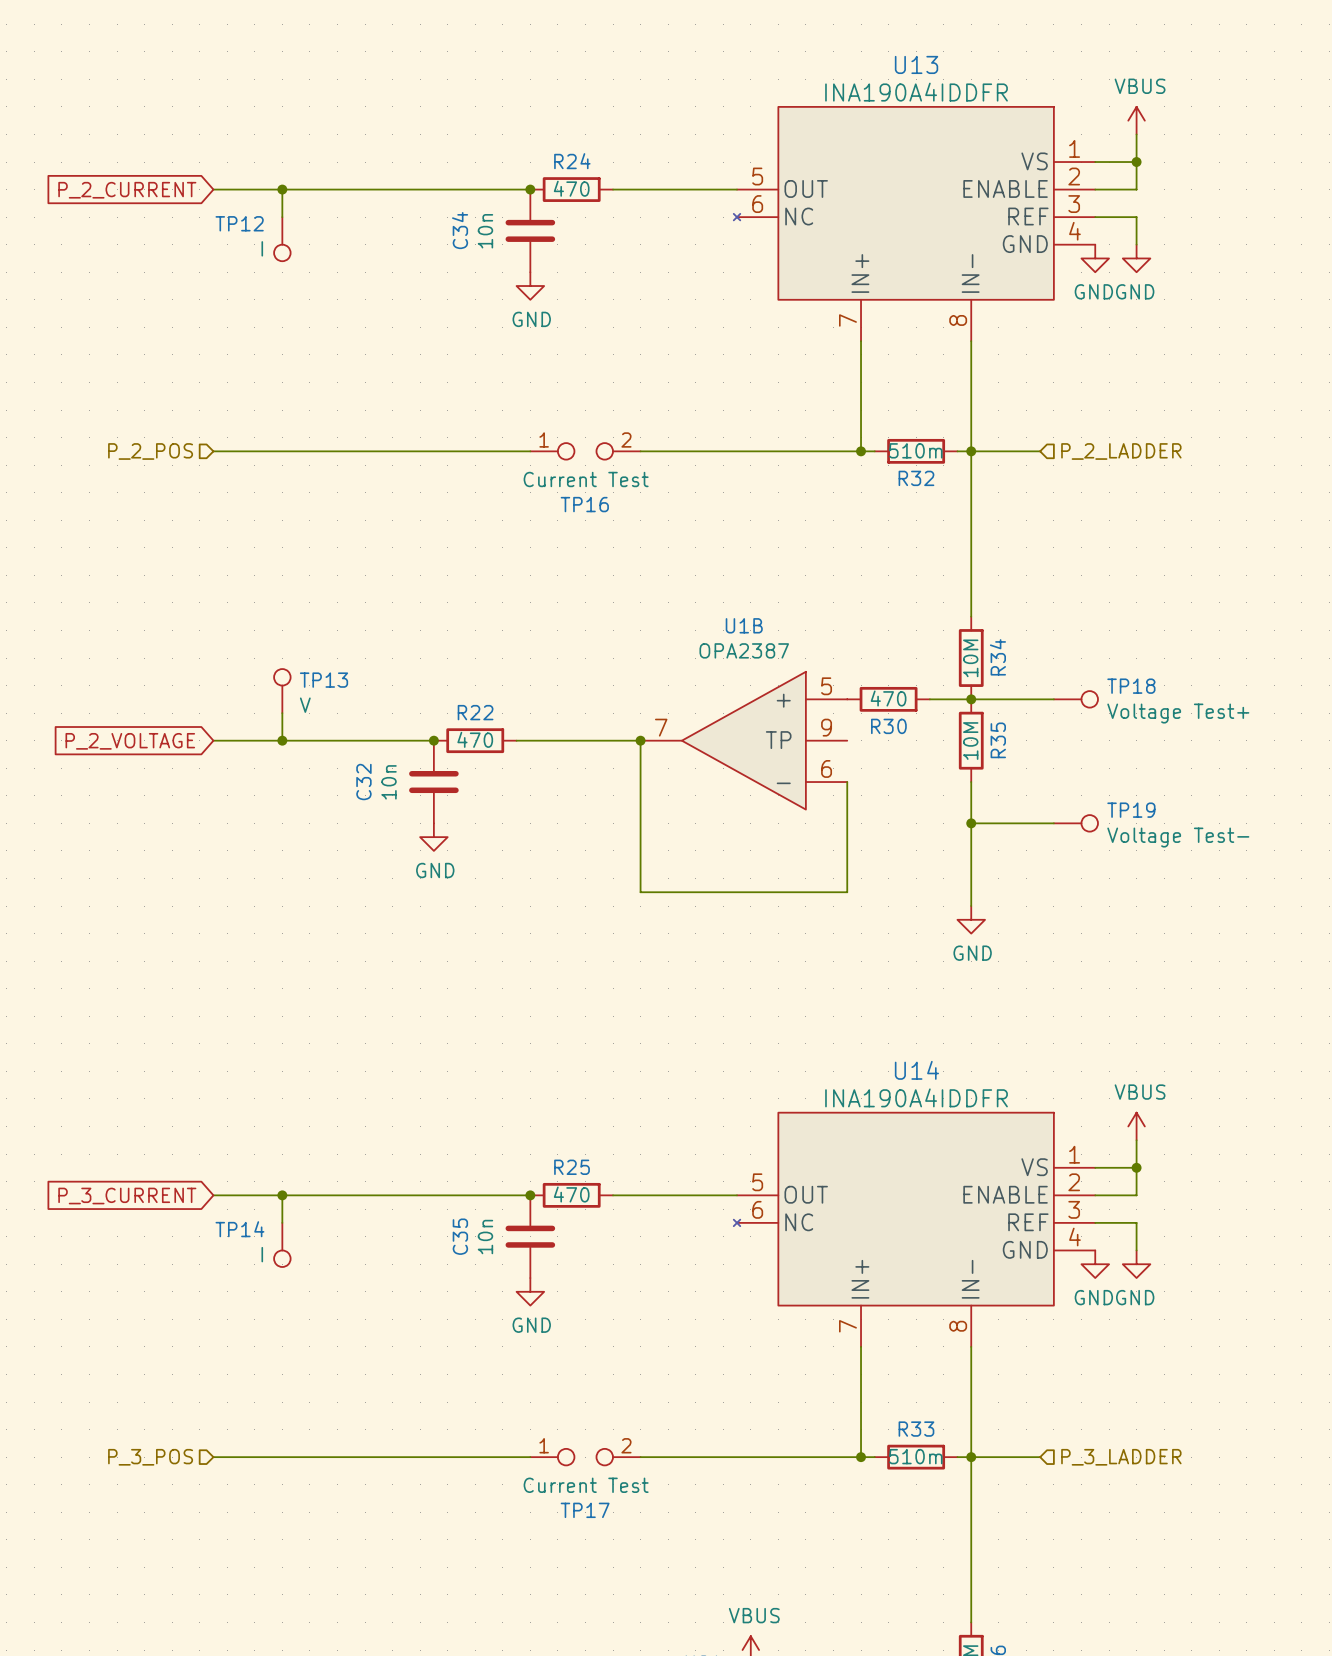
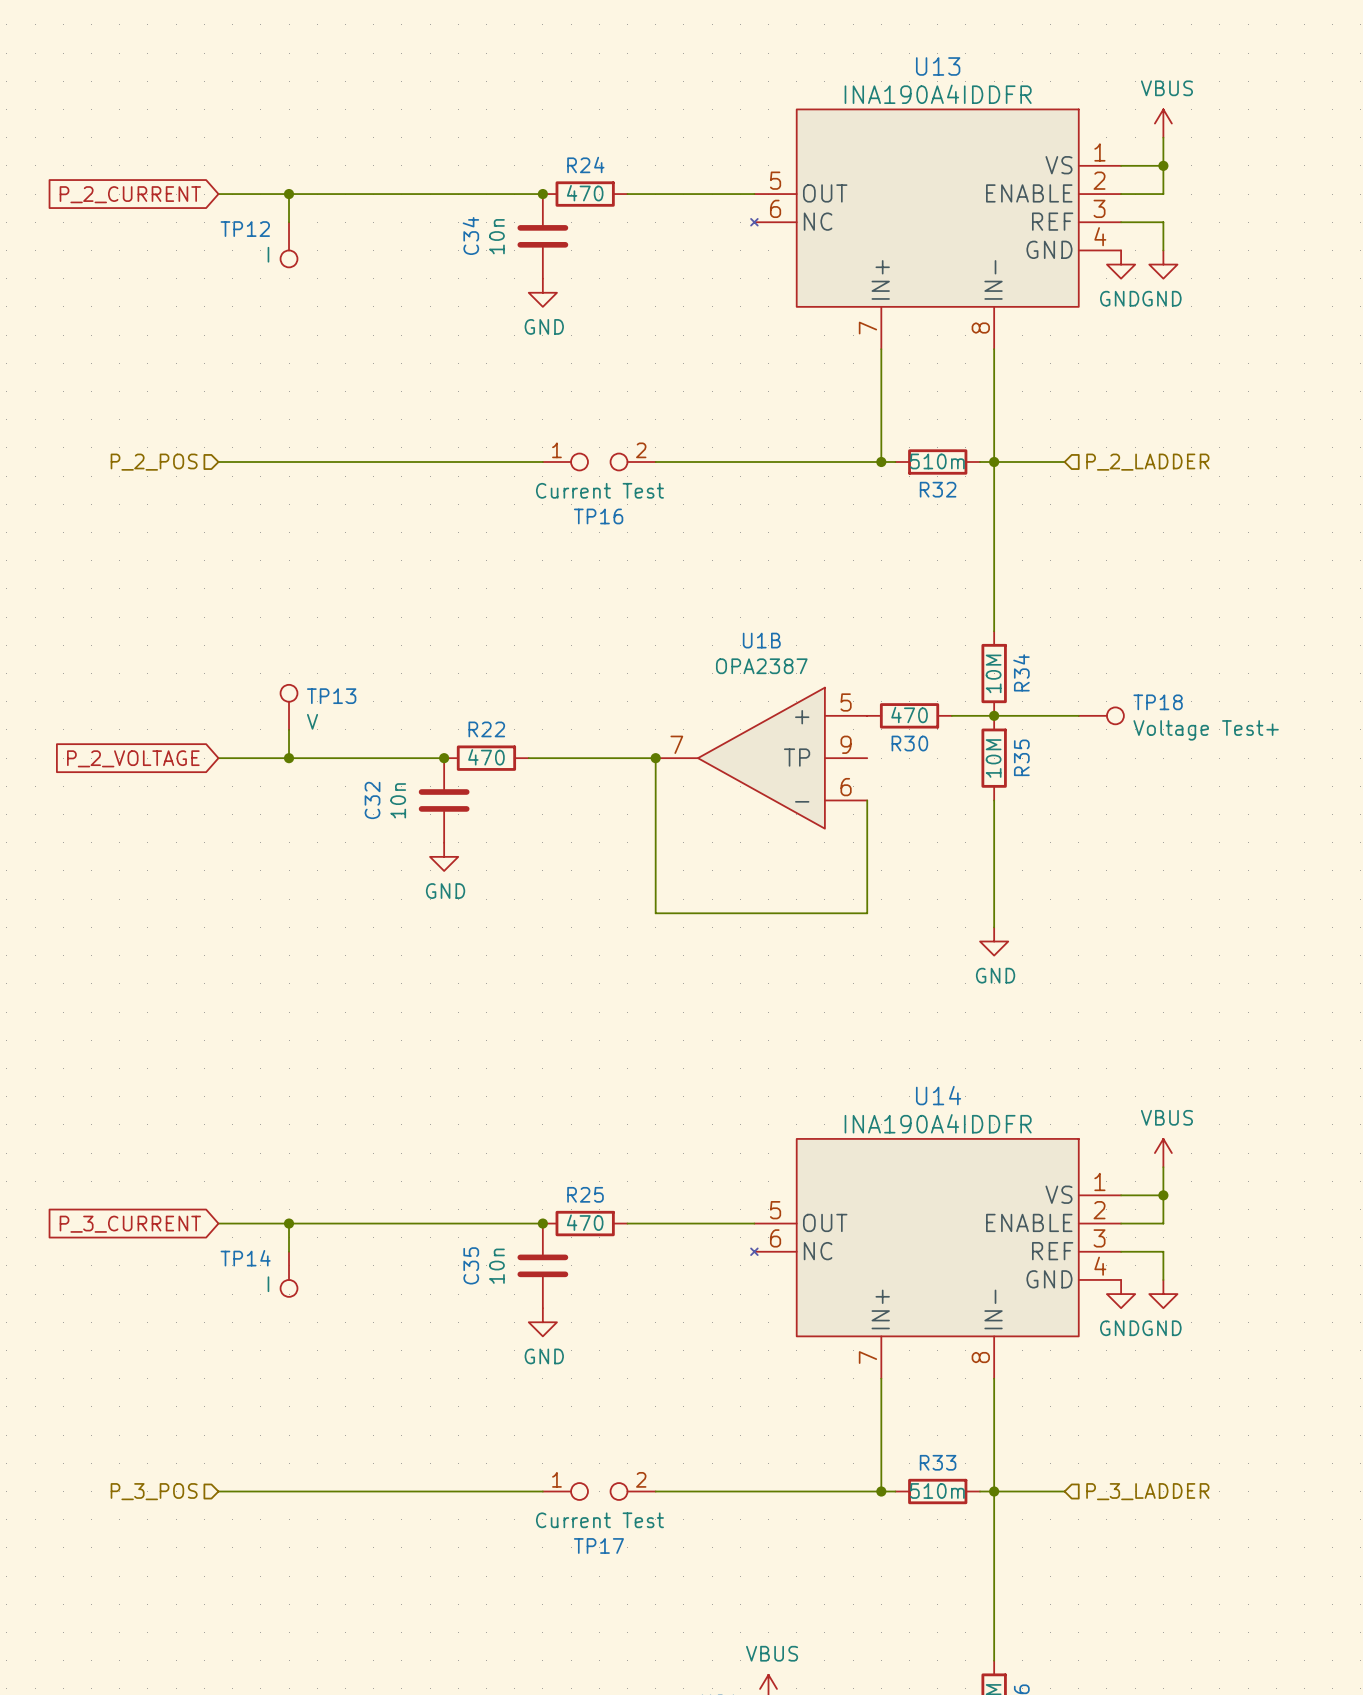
wire: (971, 823) (1053, 823) -> none
junction: (971, 823) -> none
TP19: Voltage Test- (1075, 823) -> none

